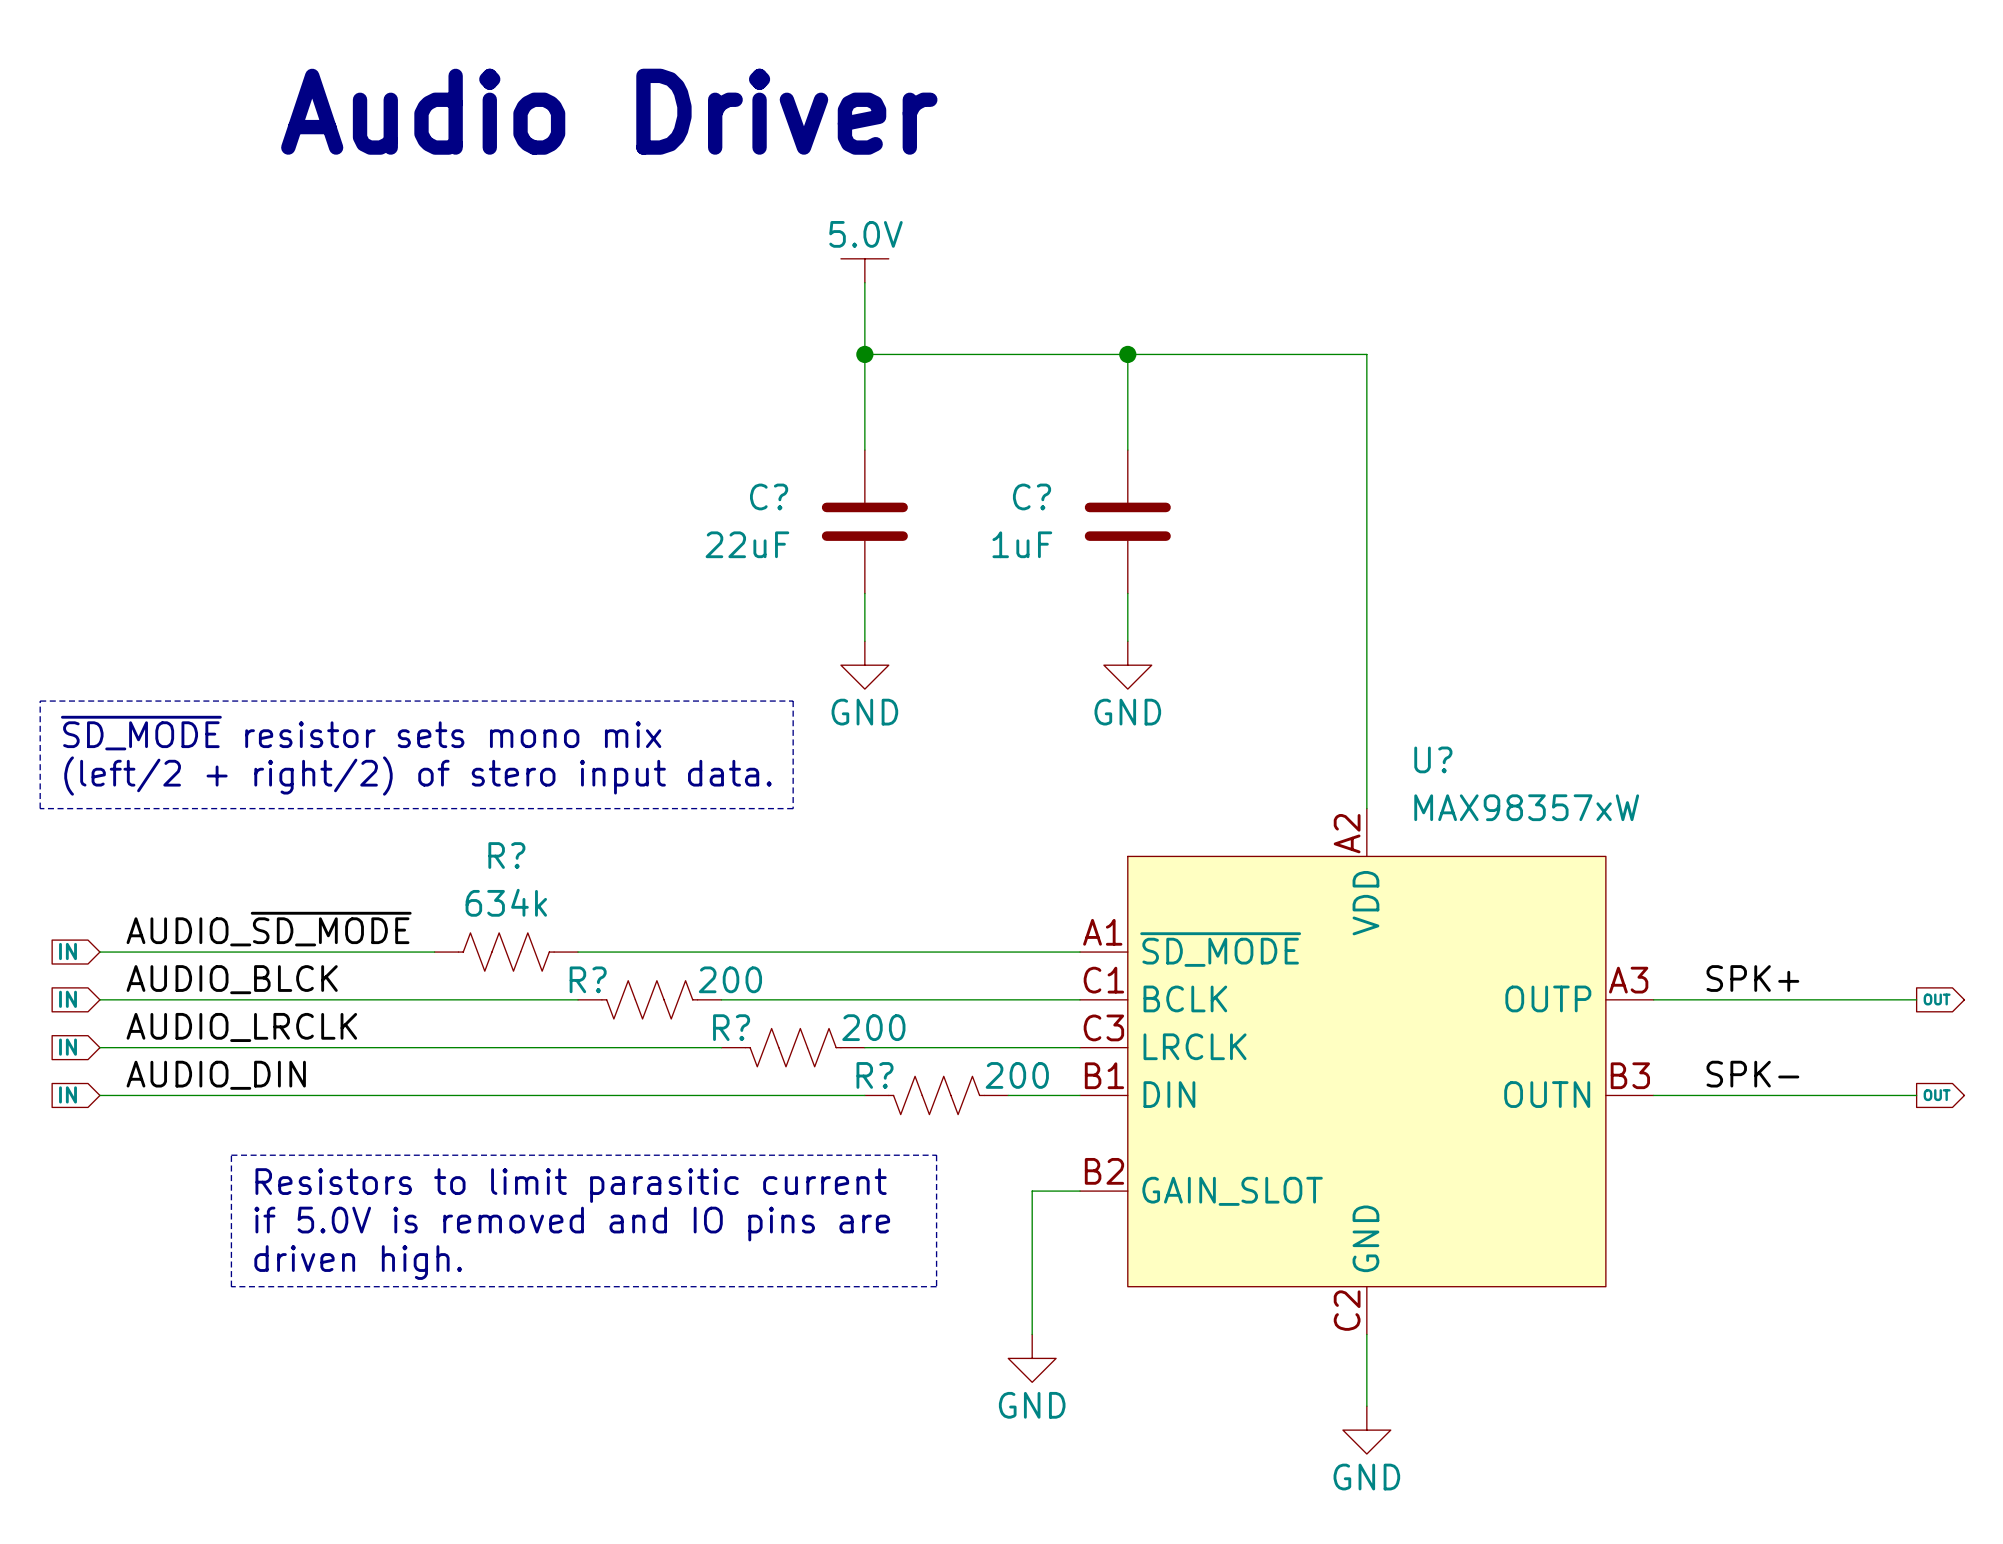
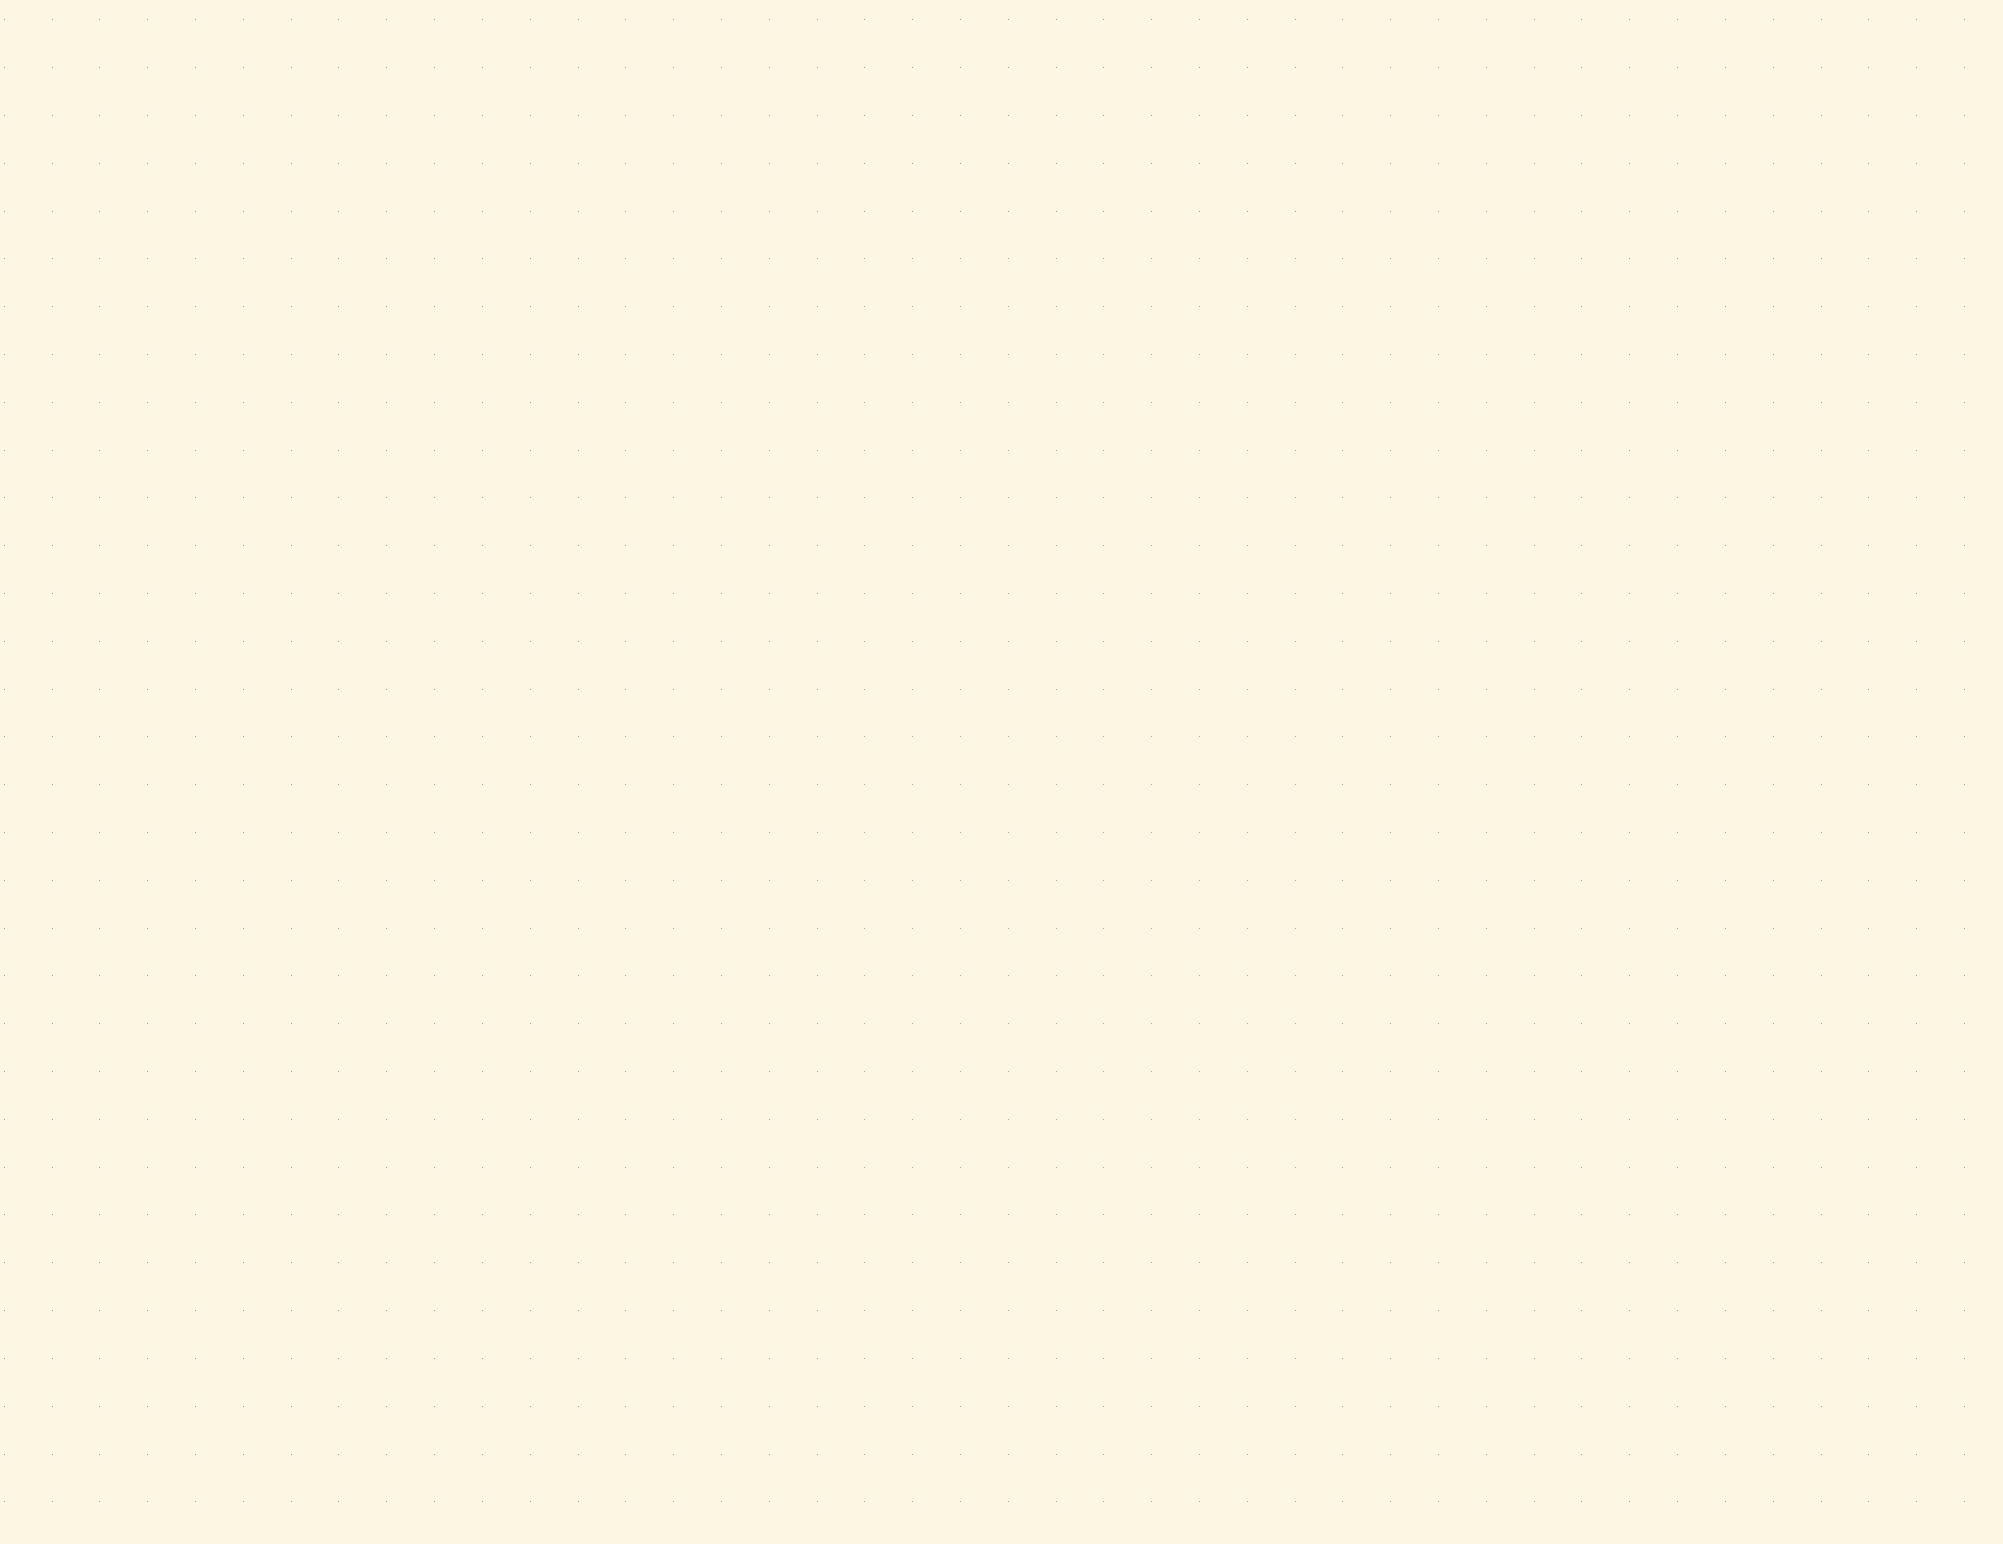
text: Audio Driver (609, 111) -> none
power symbol: 5.0V (864, 270) -> none
wire: (864, 282) (864, 450) -> none
wire: (864, 354) (1366, 354) (1366, 808) -> none
junction: (864, 354) -> none
wire: (1127, 354) (1127, 450) -> none
junction: (1127, 354) -> none
C?: 22uF (864, 521) -> none
C?: 1uF (1127, 521) -> none
wire: (864, 593) (864, 641) -> none
wire: (1127, 593) (1127, 641) -> none
power symbol: GND (864, 665) -> none
power symbol: GND (1127, 665) -> none
line: (40, 701) (793, 701) (793, 808) (40, 808) (40, 701) -> none
text: ~{SD_MODE} resistor sets mono mix (361, 733) -> none
text: (left/2 + right/2) of stero input data. (417, 776) -> none
label: AUDIO_~{SD_MODE} (269, 929) -> none
part: (76, 952) -> none
wire: (99, 952) (434, 952) -> none
R?: 634k (506, 952) -> none
wire: (578, 952) (1080, 952) -> none
label: SPK+ (1752, 978) -> none
label: AUDIO_BLCK (232, 979) -> none
part: (76, 999) -> none
wire: (99, 999) (578, 999) -> none
R?: 200 (649, 999) -> none
wire: (721, 999) (1080, 999) -> none
wire: (1653, 999) (1916, 999) -> none
part: (1940, 999) -> none
label: AUDIO_LRCLK (241, 1027) -> none
part: (76, 1047) -> none
wire: (99, 1047) (721, 1047) -> none
R?: 200 (793, 1047) -> none
wire: (864, 1047) (1080, 1047) -> none
U?: MAX98357xW (1366, 1071) -> none
label: SPK- (1752, 1074) -> none
label: AUDIO_DIN (216, 1075) -> none
part: (76, 1095) -> none
wire: (99, 1095) (864, 1095) -> none
R?: 200 (936, 1095) -> none
wire: (1008, 1095) (1080, 1095) -> none
wire: (1653, 1095) (1916, 1095) -> none
part: (1940, 1095) -> none
line: (231, 1155) (936, 1155) (936, 1286) (231, 1286) (231, 1155) -> none
text: Resistors to limit parasitic current (571, 1185) -> none
wire: (1080, 1191) (1032, 1191) (1032, 1334) -> none
text: if 5.0V is removed and IO pins are (572, 1224) -> none
text: driven high. (358, 1262) -> none
wire: (1366, 1334) (1366, 1406) -> none
power symbol: GND (1032, 1358) -> none
power symbol: GND (1366, 1430) -> none

